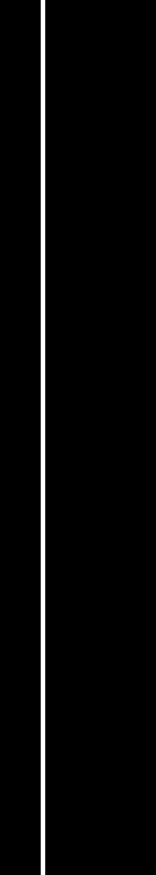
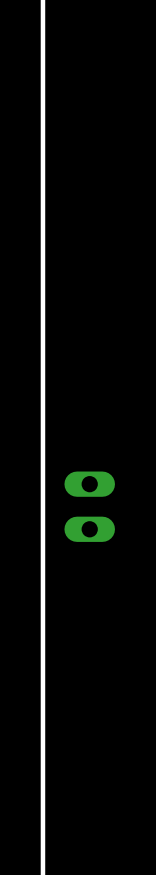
part: none -> (89, 506)

